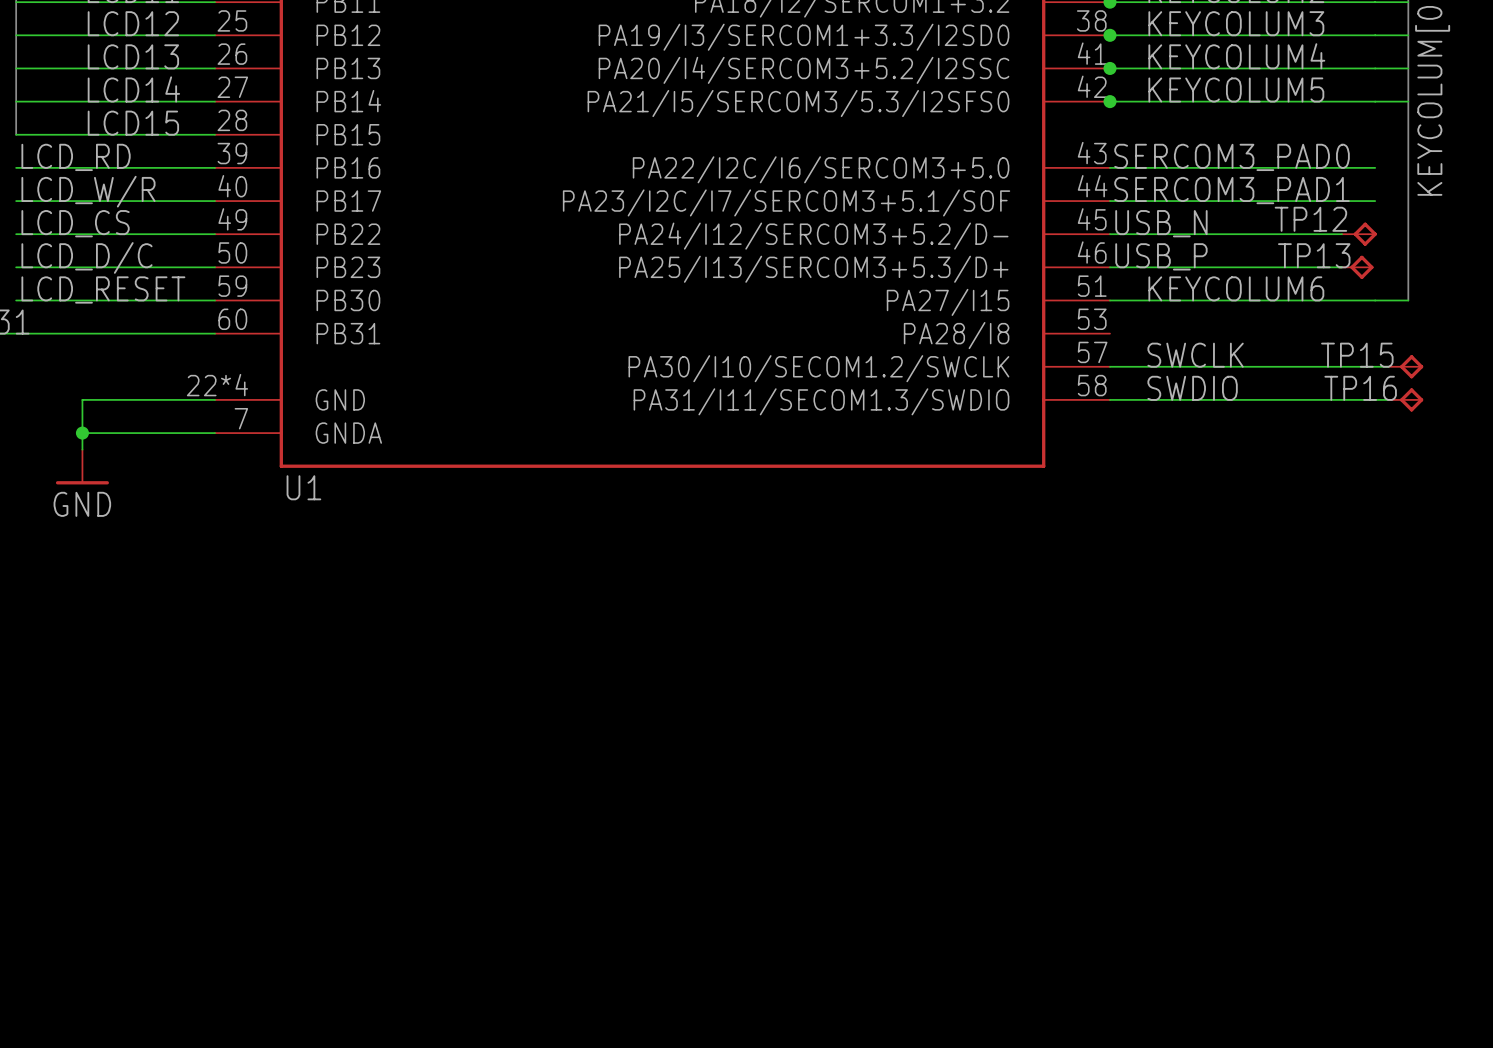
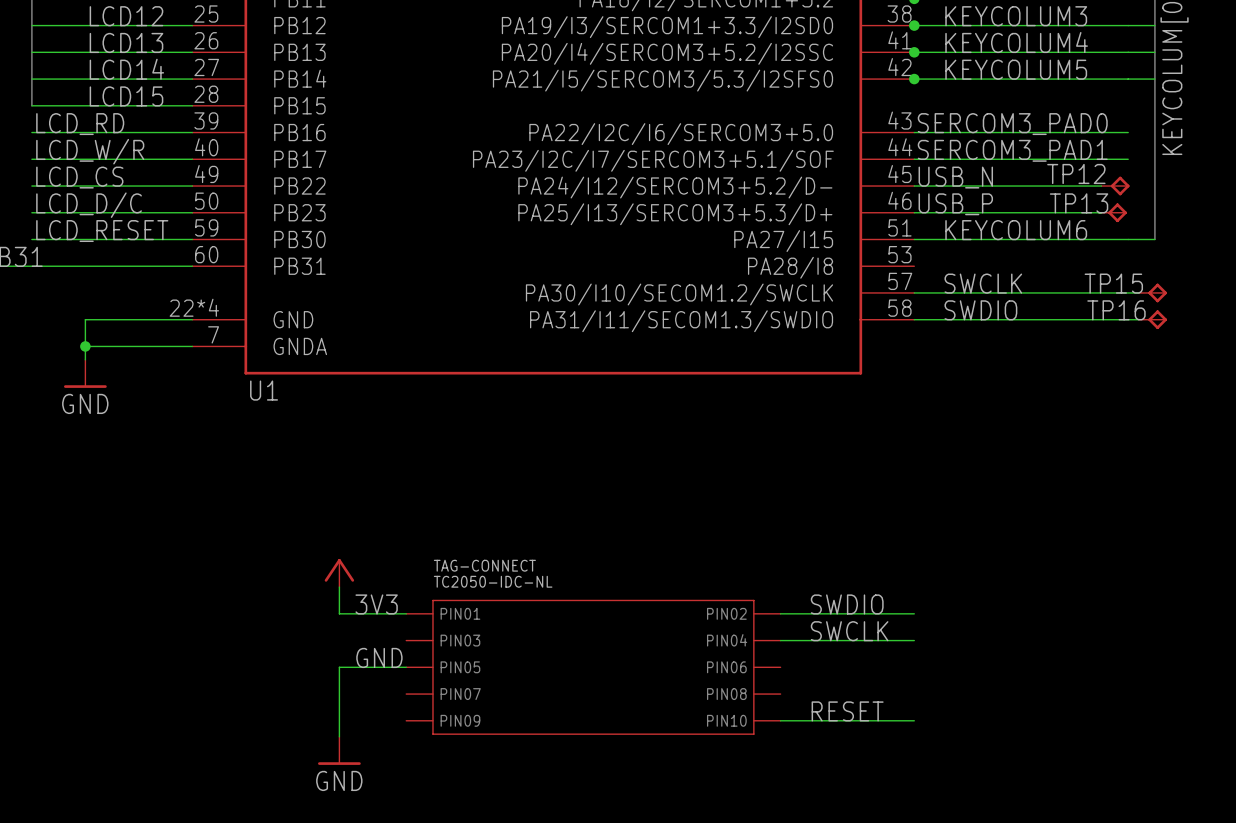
power symbol: none -> (339, 573)
wire: none -> (339, 587) (339, 613) (406, 613)
label: none -> 3V3 (376, 604)
label: none -> SWDIO (847, 604)
wire: none -> (780, 613) (914, 613)
label: none -> SWCLK (849, 631)
wire: none -> (780, 640) (914, 640)
label: none -> GND (379, 657)
wire: none -> (406, 667) (339, 667) (339, 736)
TAG-CONNECT: none -> TC2050-IDC-NL (593, 667)
label: none -> RESET (847, 711)
wire: none -> (780, 720) (914, 720)
power symbol: none -> GND (339, 750)

